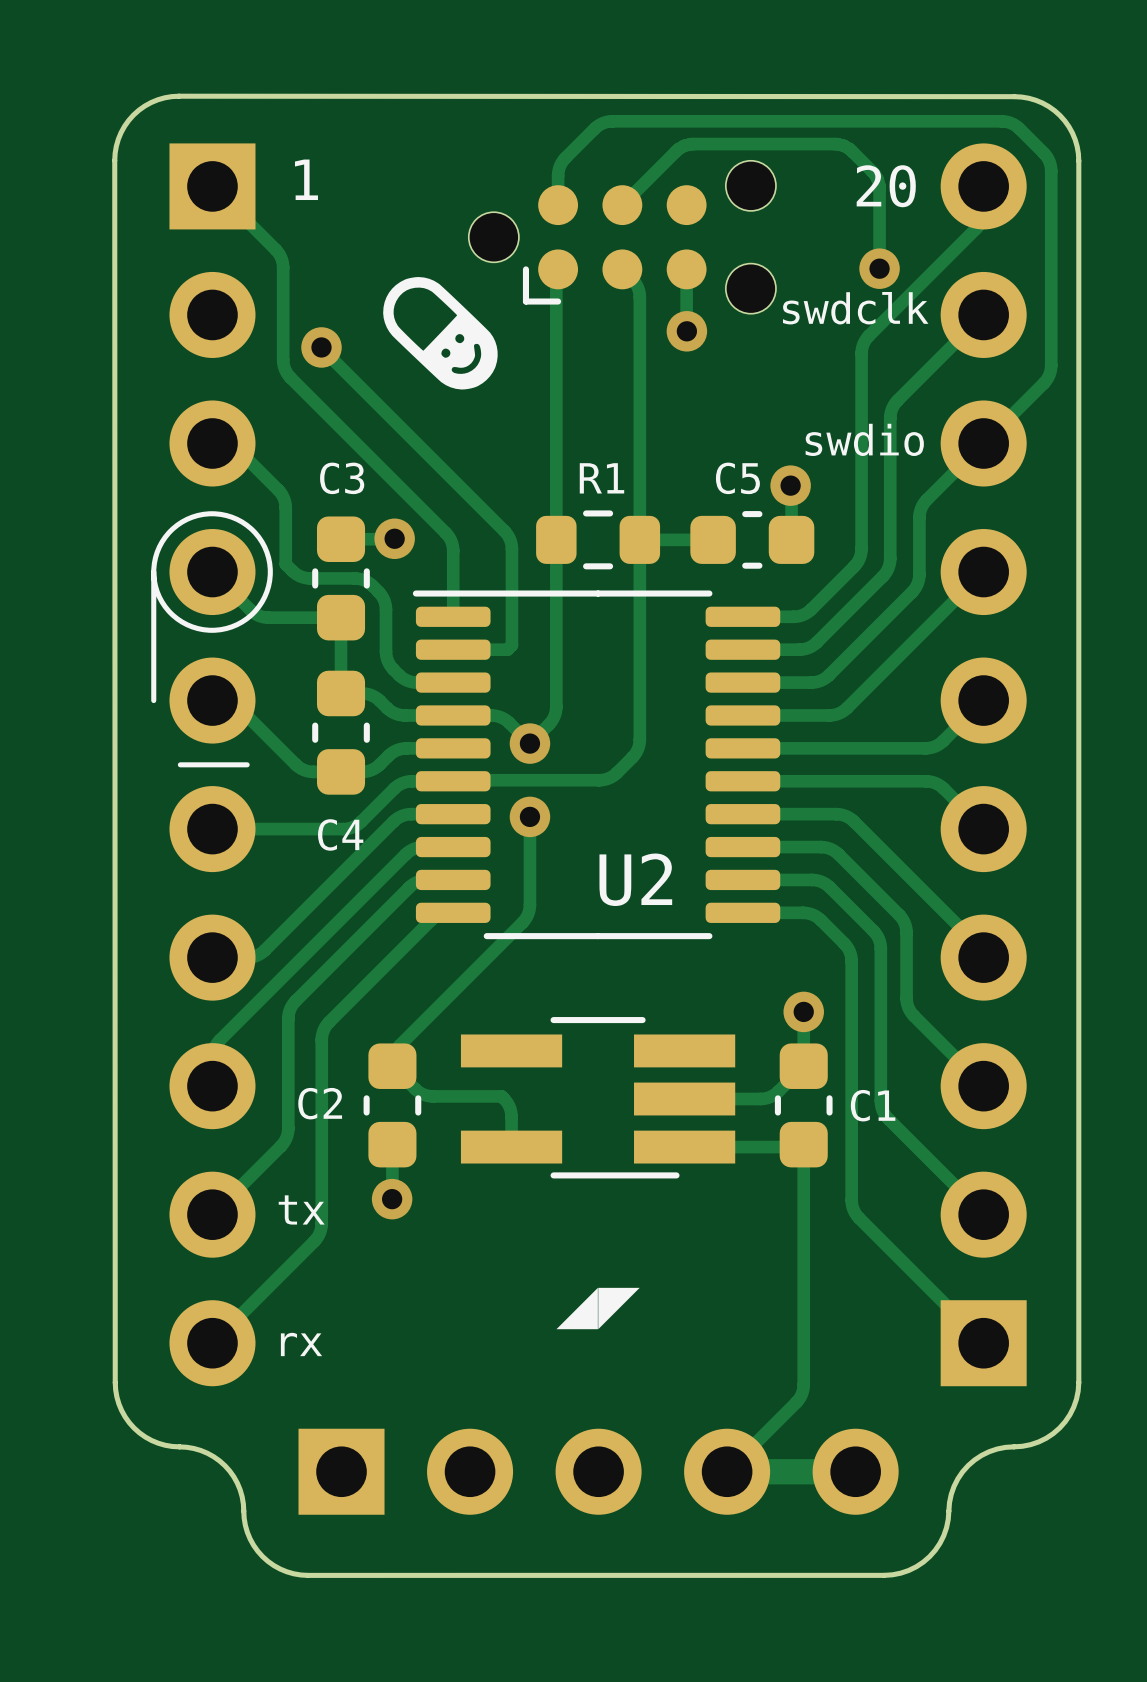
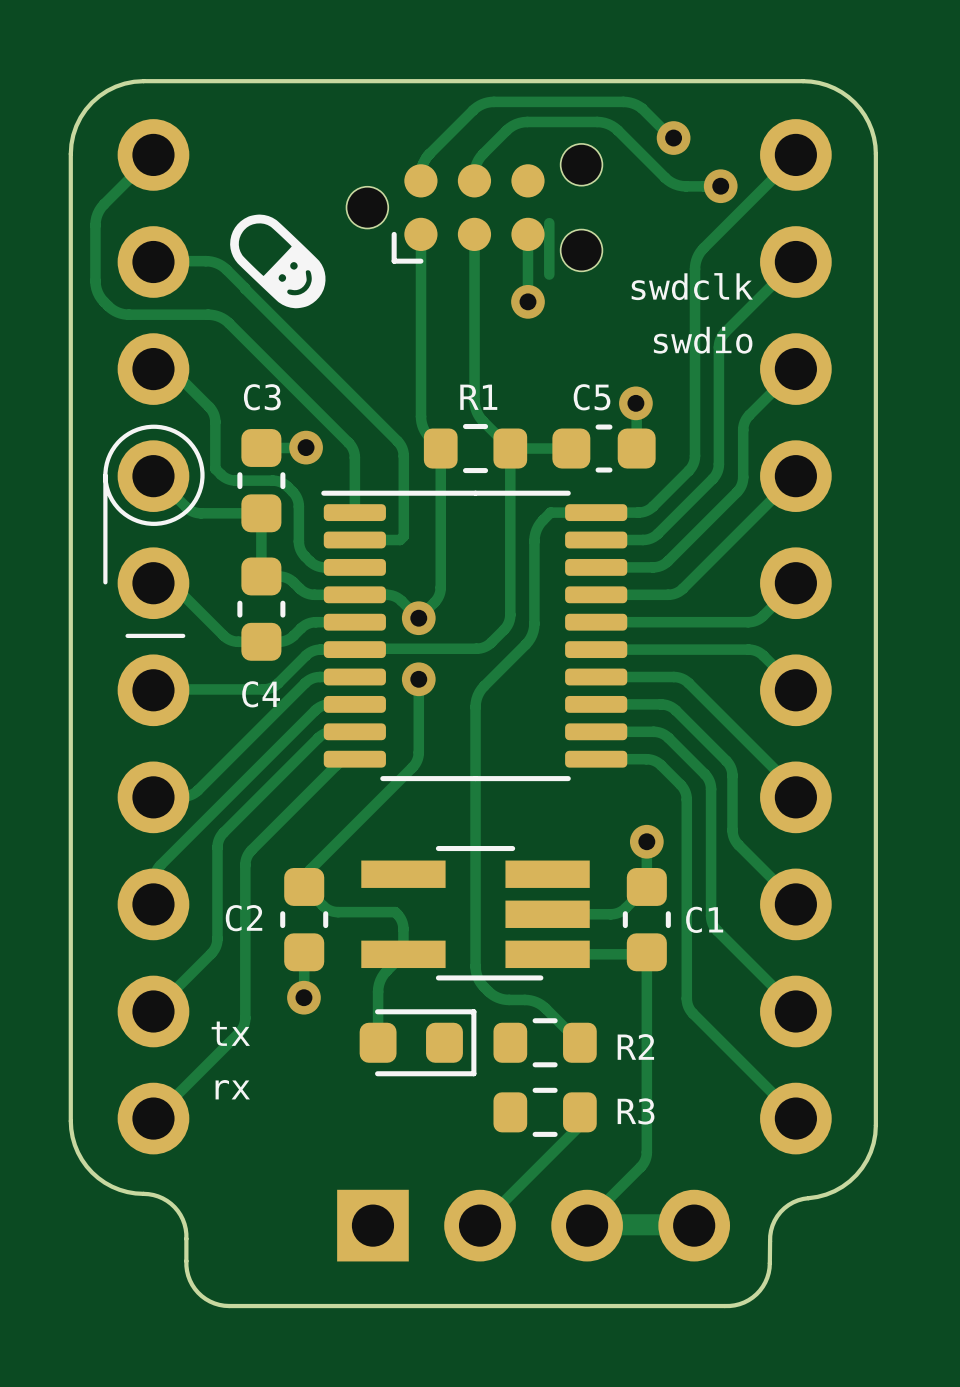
board edge: (179, 96) (1014, 96) (1028, 98) (1048, 106) (1064, 120) (1072, 133) (1077, 146) (1078, 160) (1078, 1390) (1069, 1414) (1053, 1433) (1030, 1444) (1005, 1447) (989, 1451) (968, 1465) (954, 1486) (949, 1502) (946, 1527) (940, 1543) (929, 1556) (916, 1566) (900, 1573) (884, 1575) (308, 1575) (293, 1573) (280, 1569) (267, 1561) (253, 1545) (245, 1525) (240, 1489) (233, 1476) (224, 1465) (213, 1456) (200, 1450) (165, 1445) (151, 1440) (134, 1428) (121, 1410) (116, 1396) (115, 1382) (114, 160) (118, 139) (124, 126) (133, 115) (144, 106) (157, 99) (179, 96) -> none
track: none -> (673, 138) (642, 108) (630, 102) (488, 102) (475, 108) (427, 156) (422, 166) (420, 180)
via: none -> (673, 138)
text: 1 (306, 179) -> none
track: (983, 185) (983, 213) (978, 226) (868, 335) (863, 344) (861, 353) -> (796, 155) (699, 252) (695, 266) (695, 293)
track: (212, 186) (275, 249) (281, 257) (283, 267) (283, 363) (288, 375) (302, 389) -> (154, 154) (104, 204) (97, 213) (95, 225) (95, 281) (97, 292) (110, 308) (123, 314) (211, 314) (222, 318) (229, 323)
text: 20 (886, 186) -> none
track: (558, 205) (558, 172) (561, 163) (596, 127) (607, 121) (1001, 121) (1014, 124) (1045, 154) (1050, 166) (1051, 368) (1043, 383) (983, 443) -> none
track: (622, 205) (676, 151) (684, 145) (693, 144) (837, 144) (849, 149) (877, 179) (879, 189) (879, 268) -> none
track: none -> (474, 180) (475, 167) (480, 156) (506, 130) (516, 124) (527, 121) (597, 121) (604, 122) (615, 128) (671, 182) (682, 186) (704, 186)
part position: (622, 237) -> (474, 207)
via position: (879, 268) -> (720, 186)
track: (558, 269) (556, 271) (556, 539) -> (421, 234) (421, 419) (425, 432) (440, 448)
track: (622, 269) (635, 283) (639, 294) (639, 539) -> (474, 234) (475, 406) (481, 419) (510, 448)
track: none -> (527, 234) (527, 301)
text position: swdclk (855, 308) -> swdclk (692, 286)
track: none -> (154, 261) (214, 262) (224, 267) (245, 288)
via position: (686, 331) -> (527, 301)
drawing position: (440, 333) -> (277, 261)
via: (321, 347) -> none
text position: swdio (864, 439) -> swdio (703, 340)
track: none -> (596, 512) (550, 512) (538, 526) (534, 541) (534, 623) (532, 634) (525, 644) (481, 689) (477, 695) (475, 707) (476, 974) (484, 987) (497, 997) (530, 1000) (541, 1004) (579, 1042)
part: (212, 764) -> none
part: (983, 764) -> none
part: none -> (473, 693)
U2 name: U2 (635, 879) -> none
track: none -> (403, 954) (384, 973) (379, 984) (378, 1042)
text position: tx (301, 1209) -> tx (230, 1033)
part: none -> (418, 1042)
R2: none -> (545, 1042)
text: ◢◤ (598, 1308) -> none
R3: none -> (545, 1112)
text position: rx (301, 1344) -> rx (232, 1089)
track: none -> (579, 1120) (579, 1112) (579, 1125) (480, 1225) (480, 1220)
part: (598, 1471) -> none

